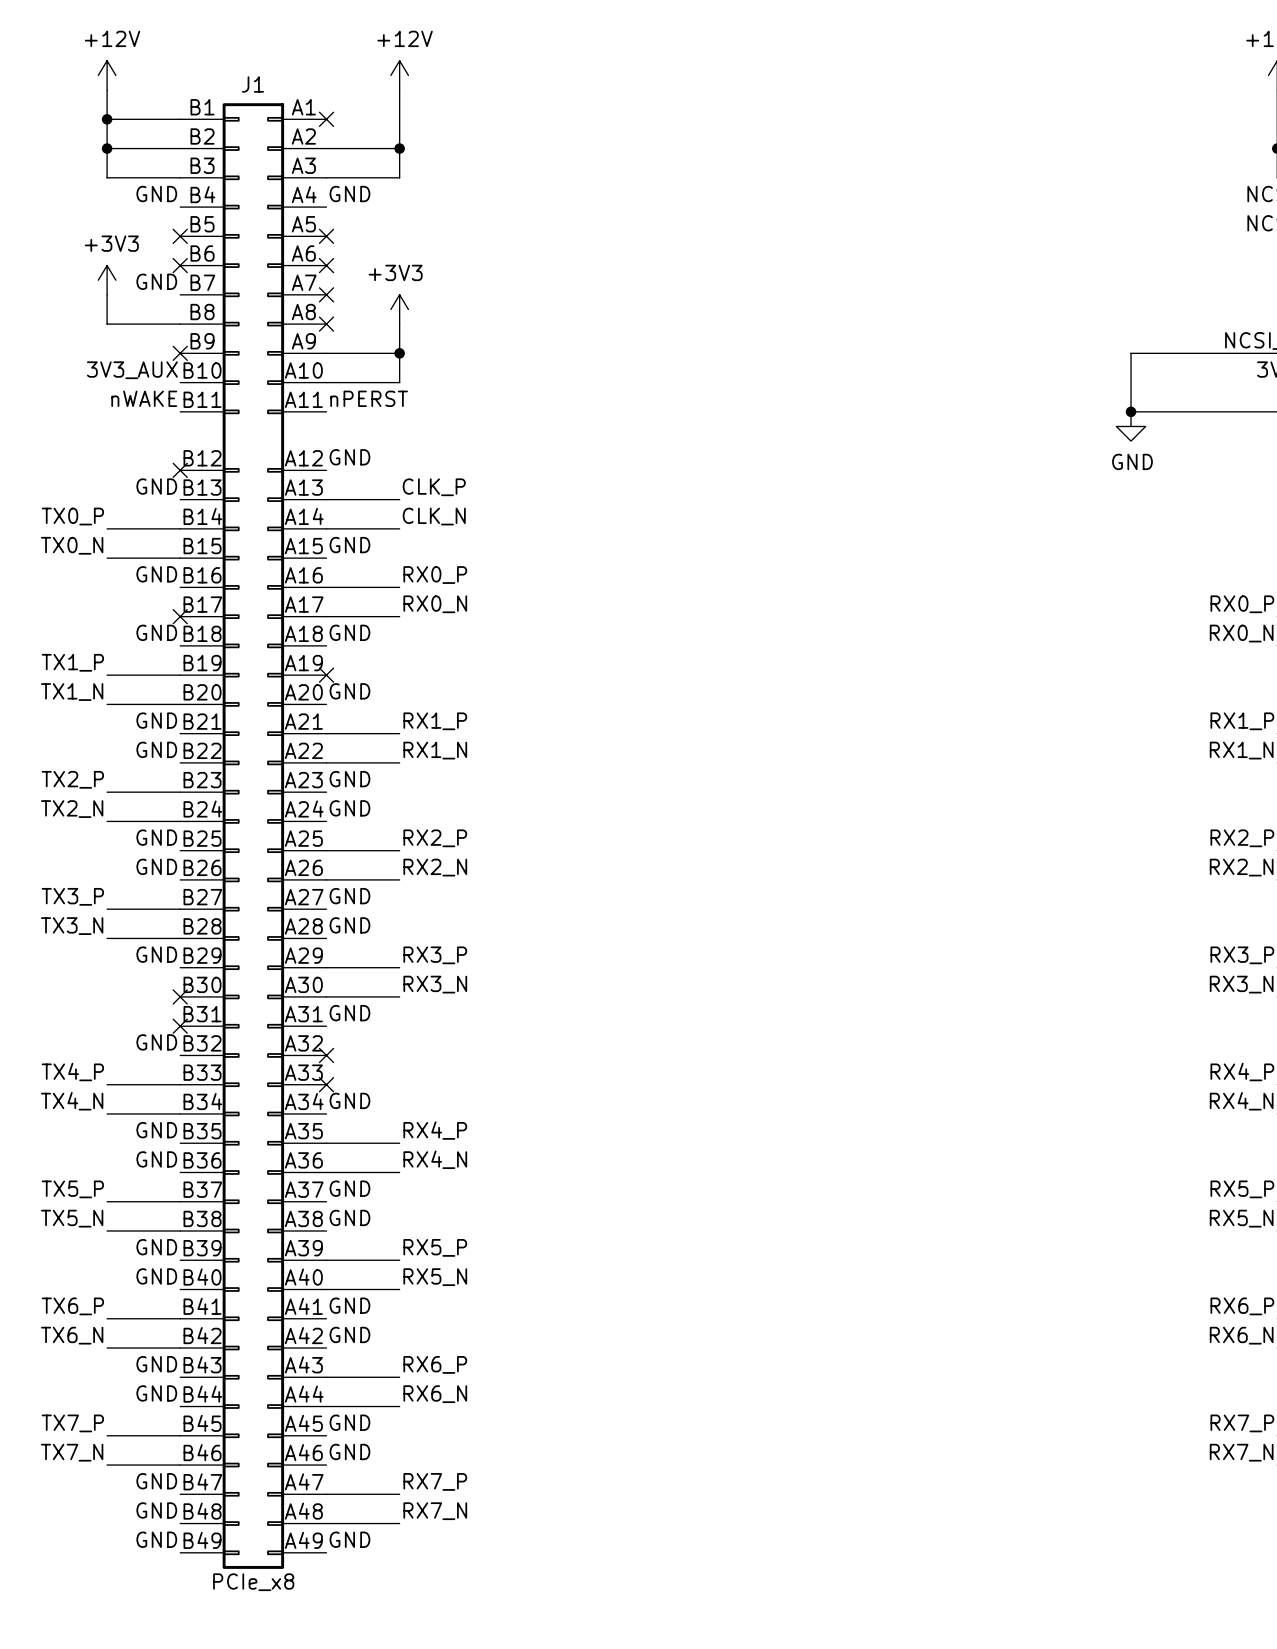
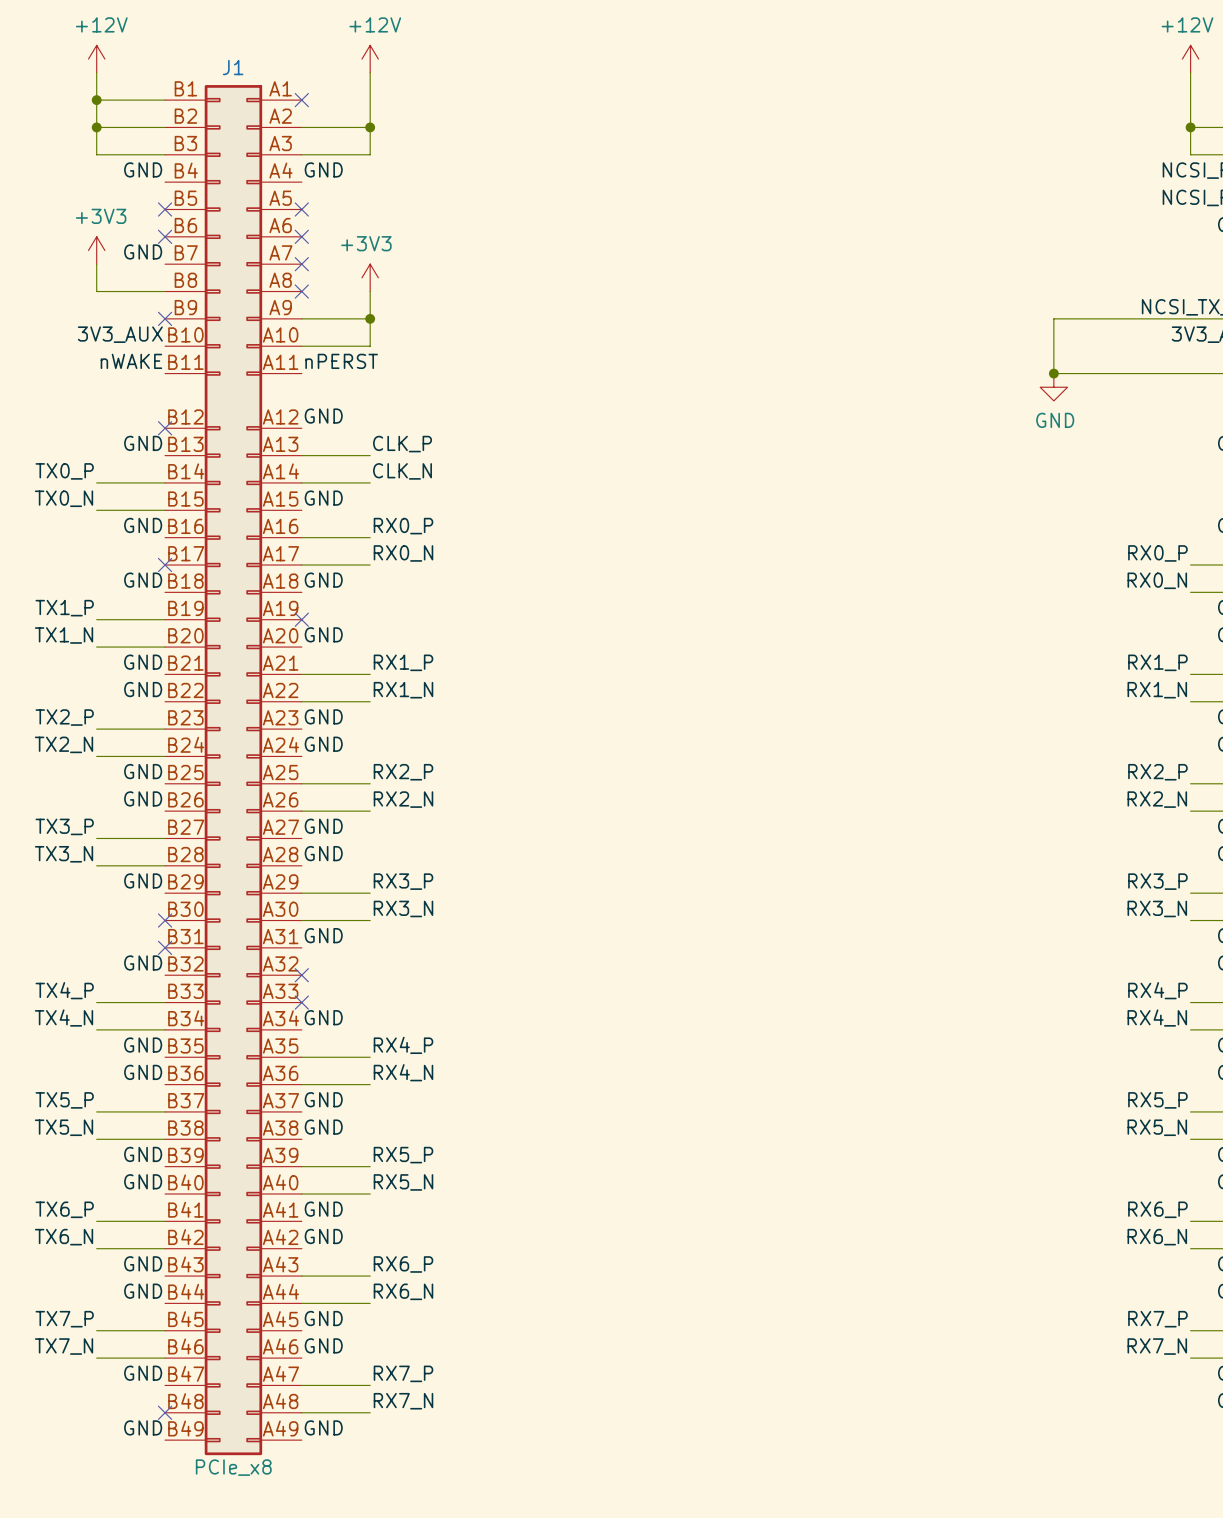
label: GND (156, 1510) -> none
no-connect mark: none -> (165, 1412)

